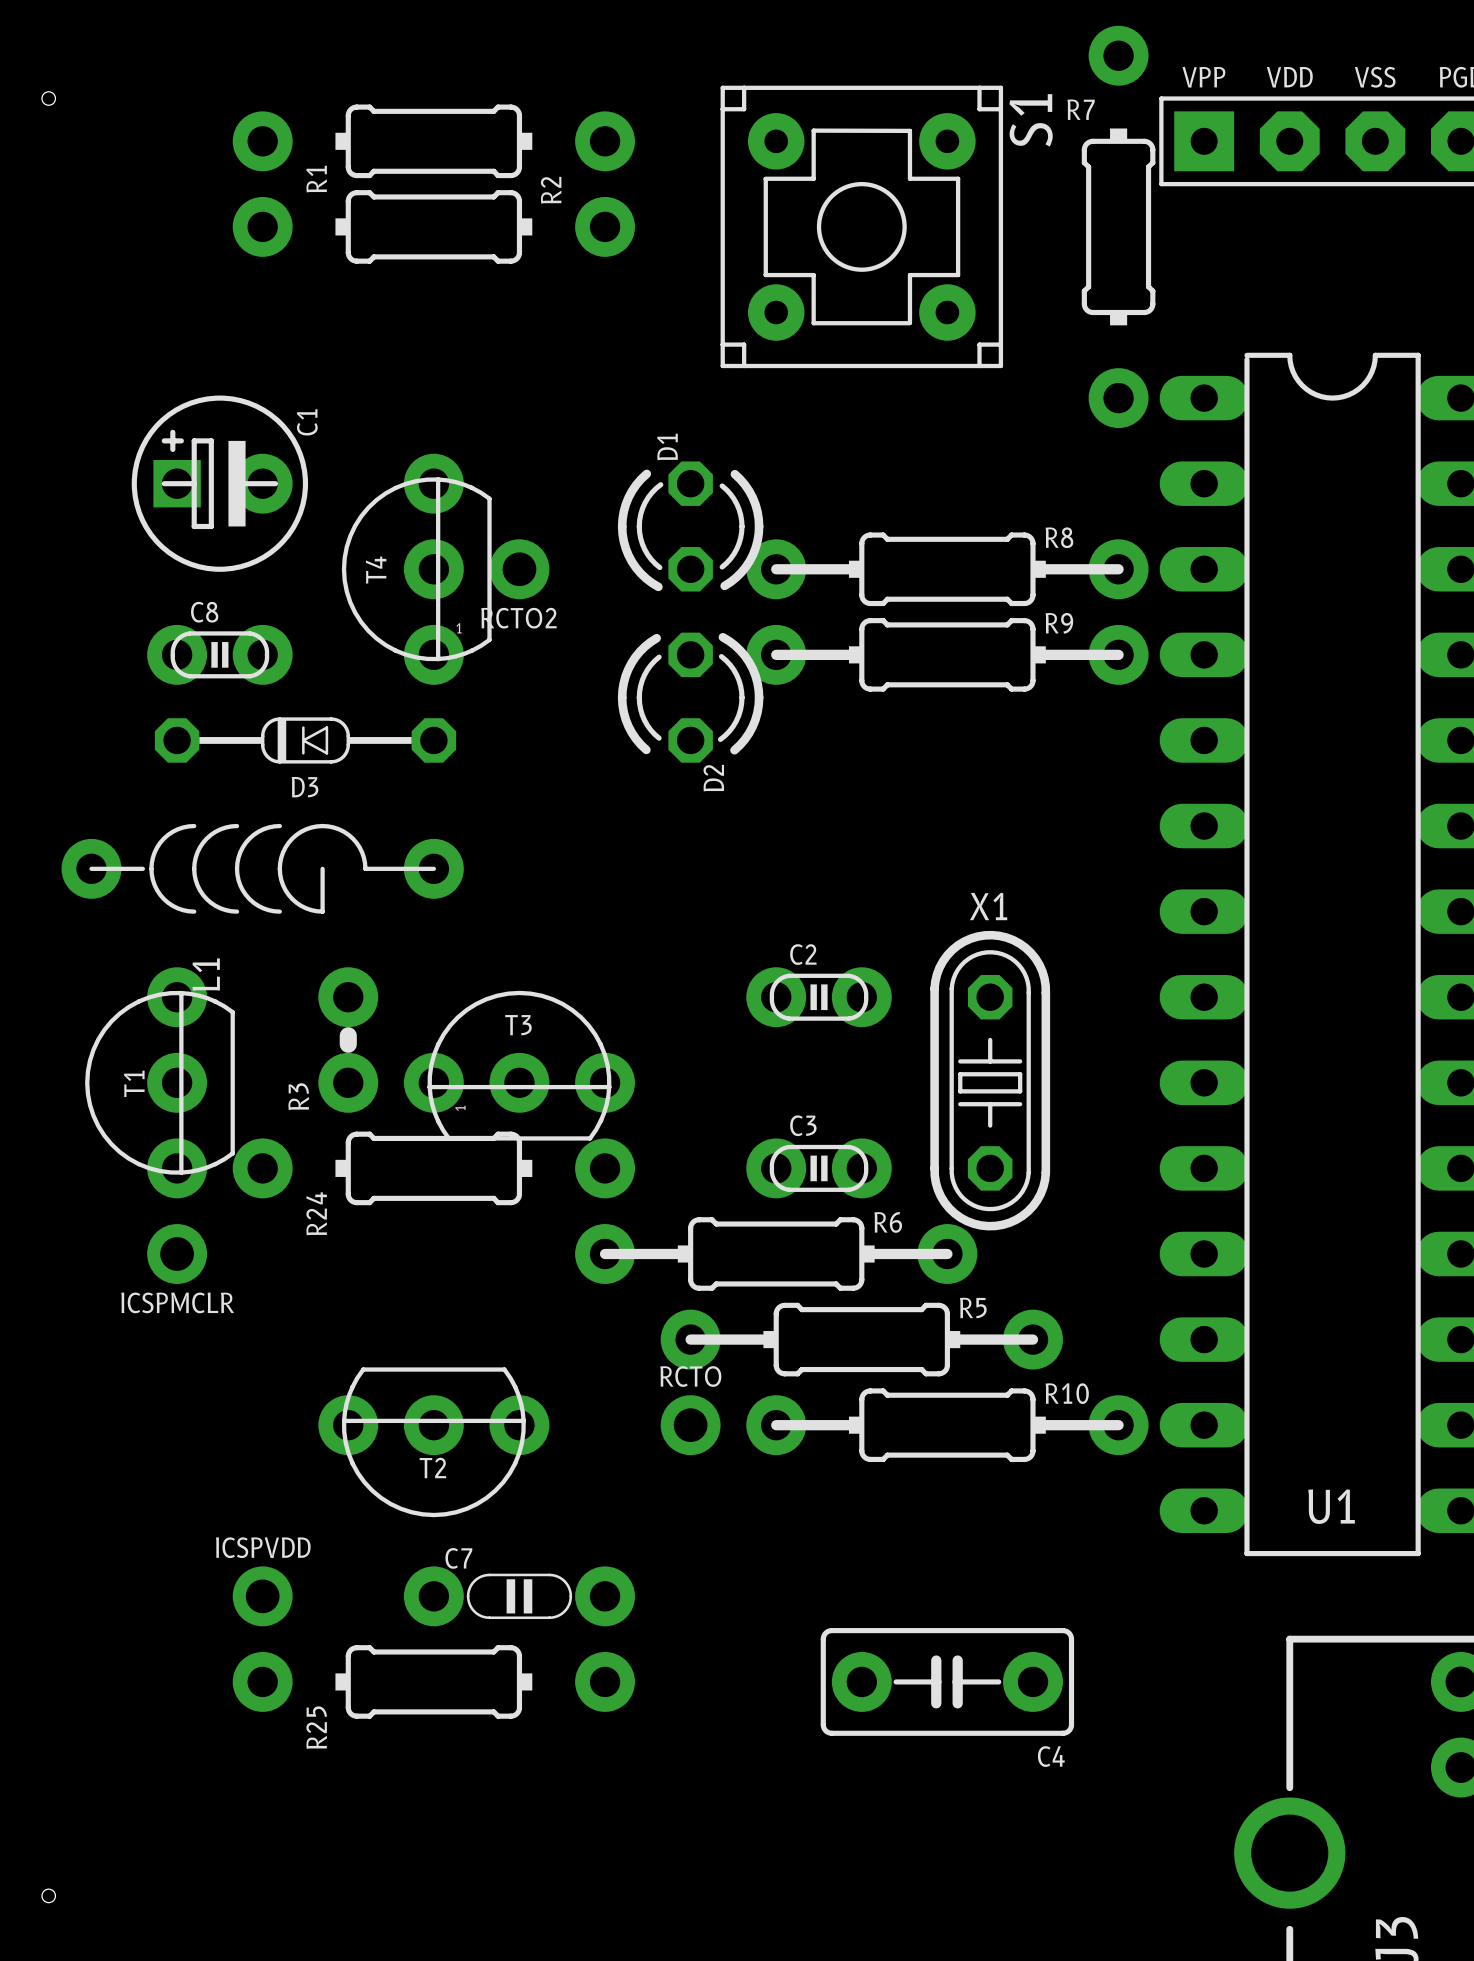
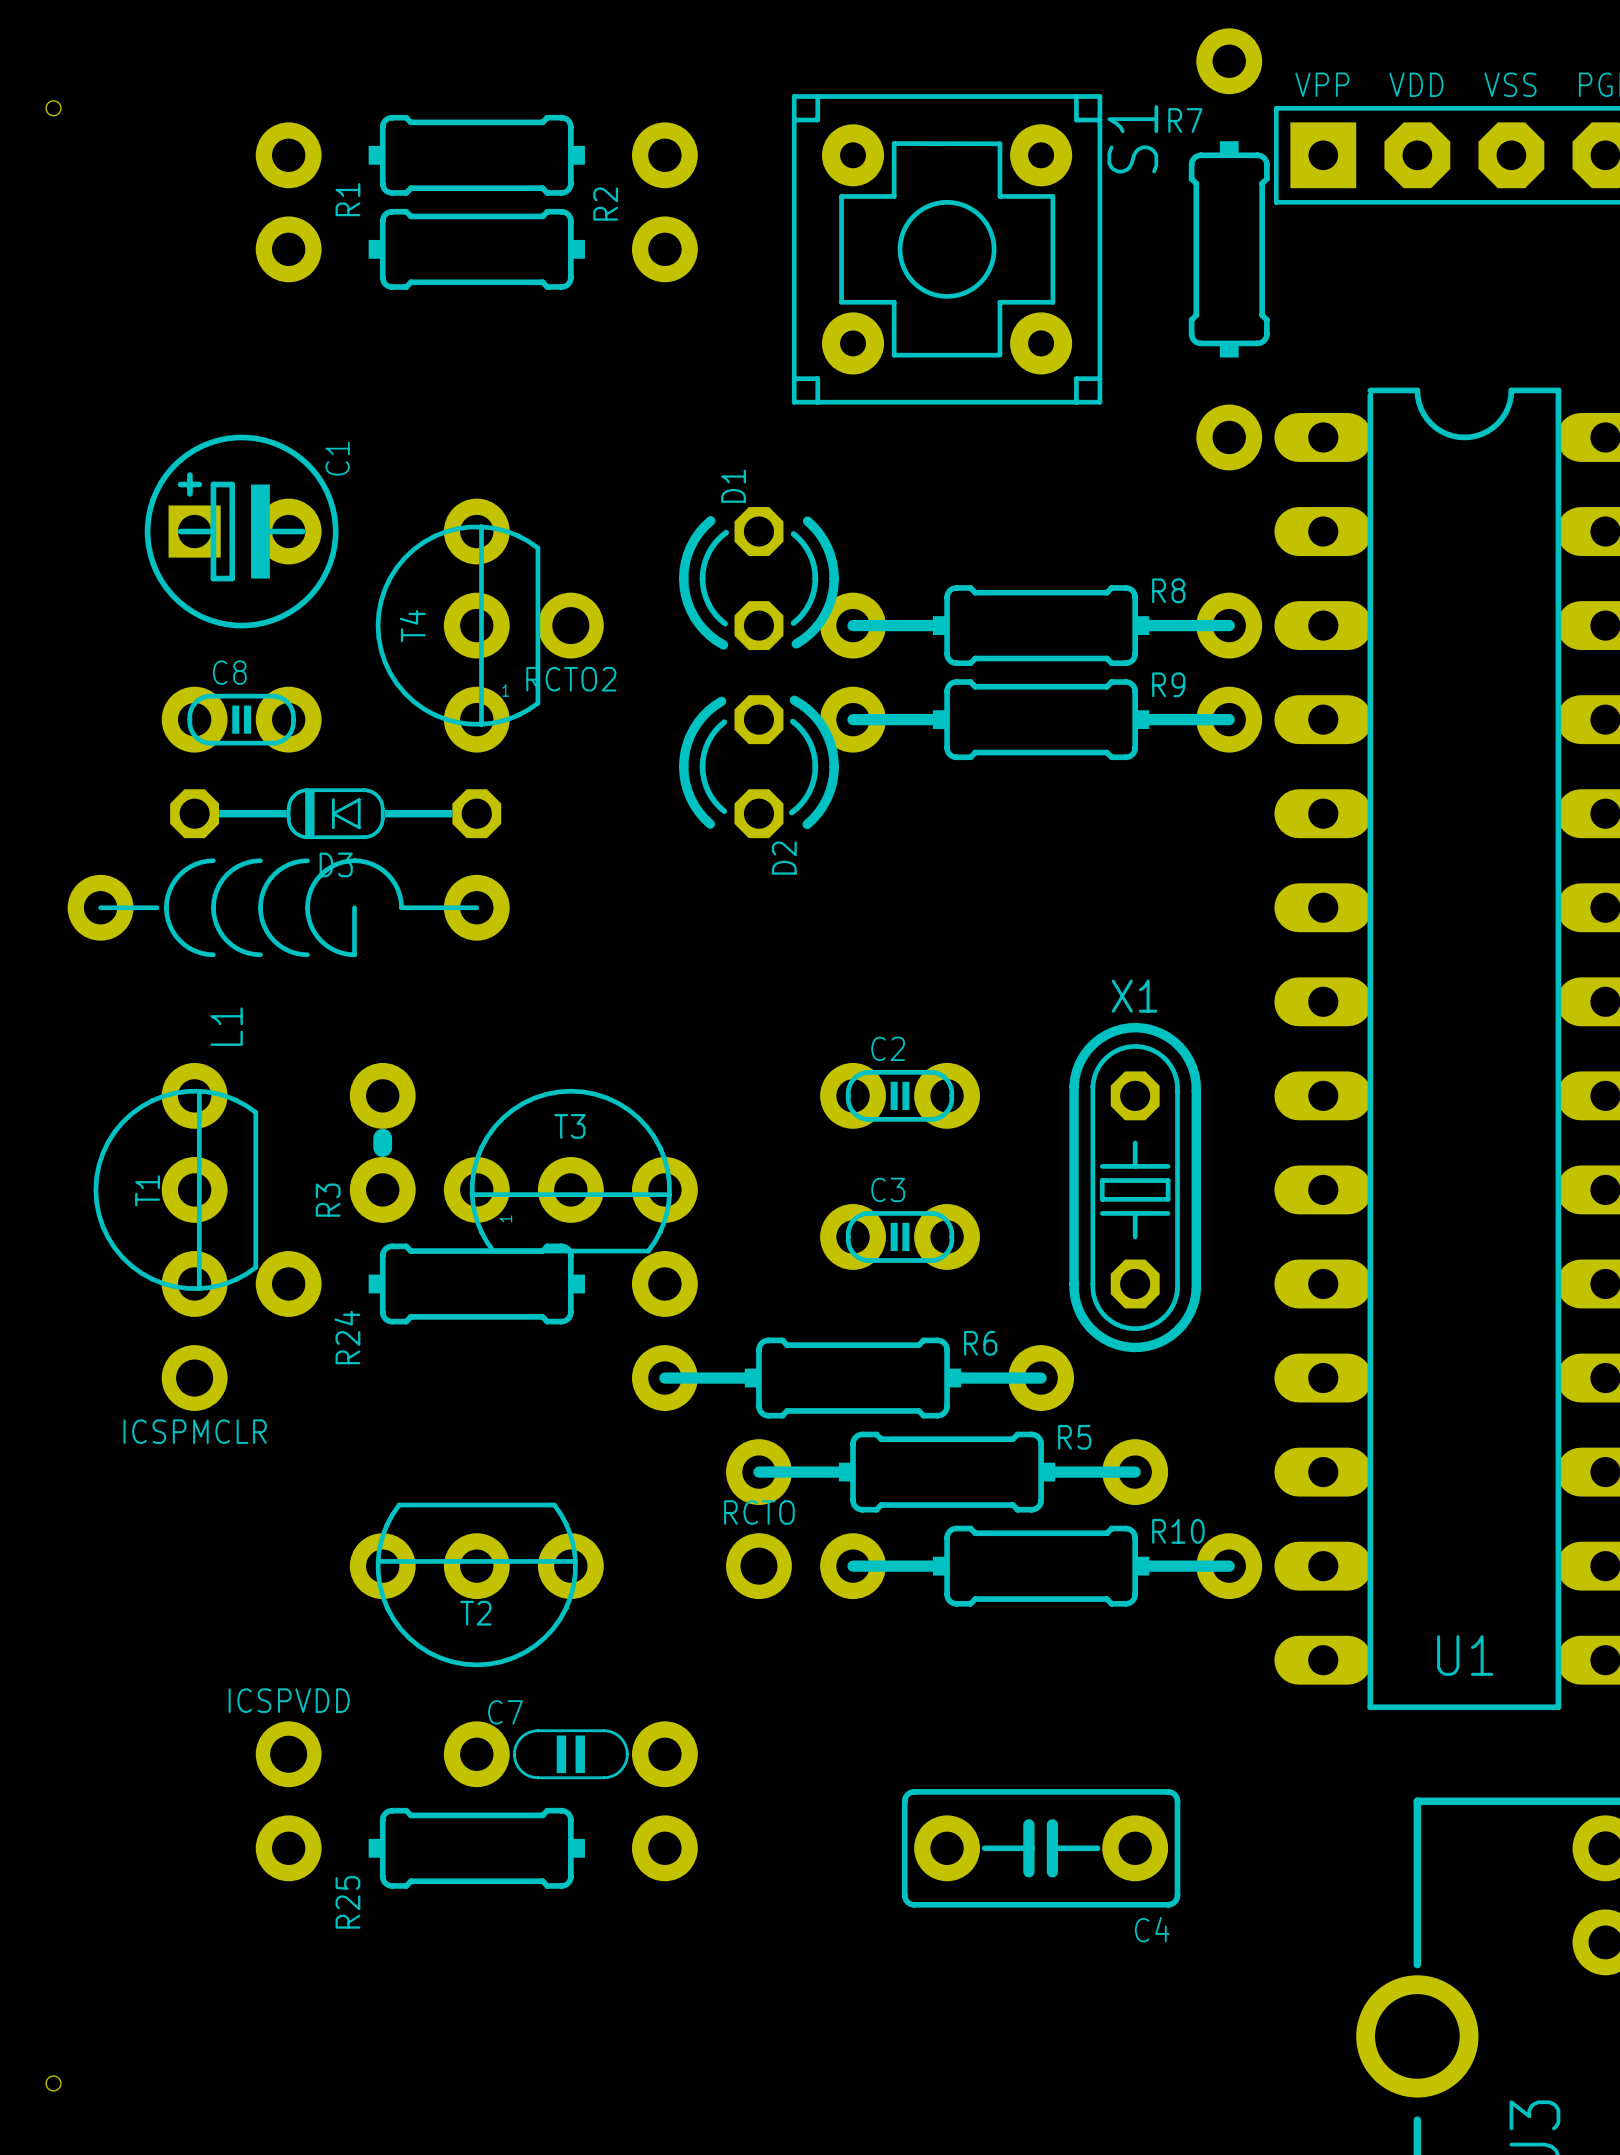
L1 position: (262, 868) -> (288, 907)
X1 position: (990, 1080) -> (1135, 1187)
C3 position: (819, 1168) -> (900, 1236)

